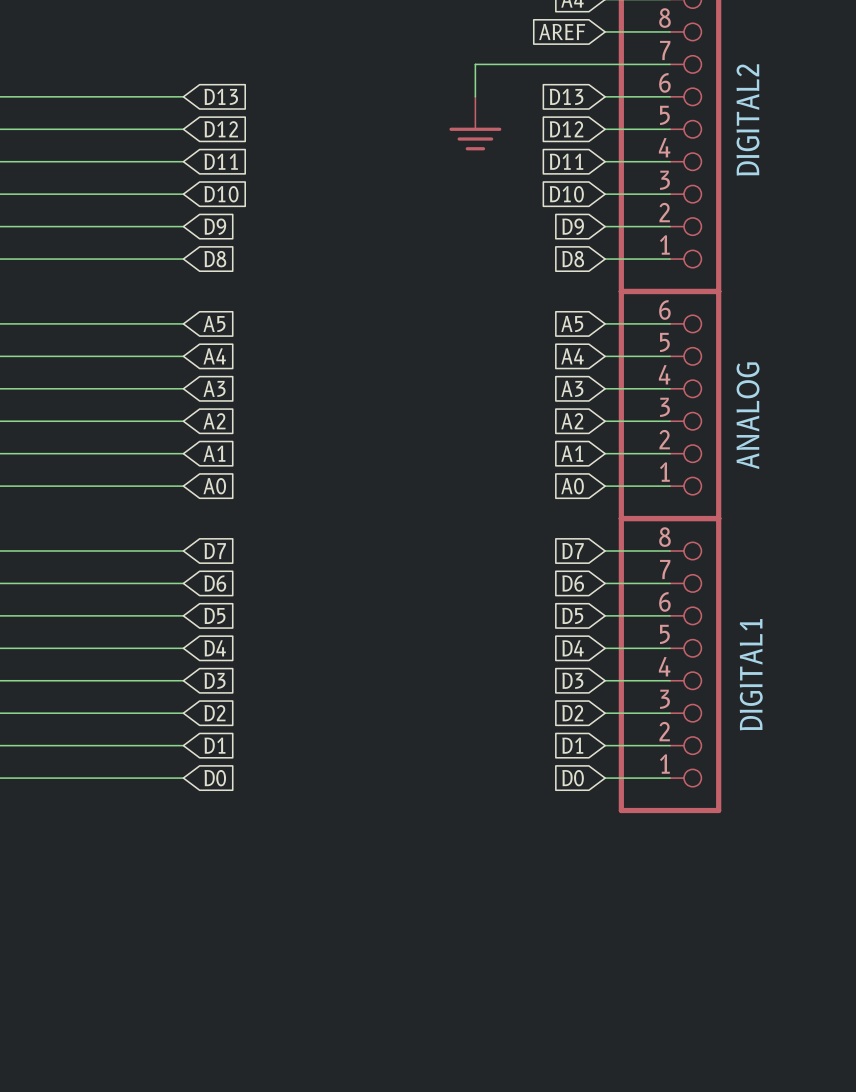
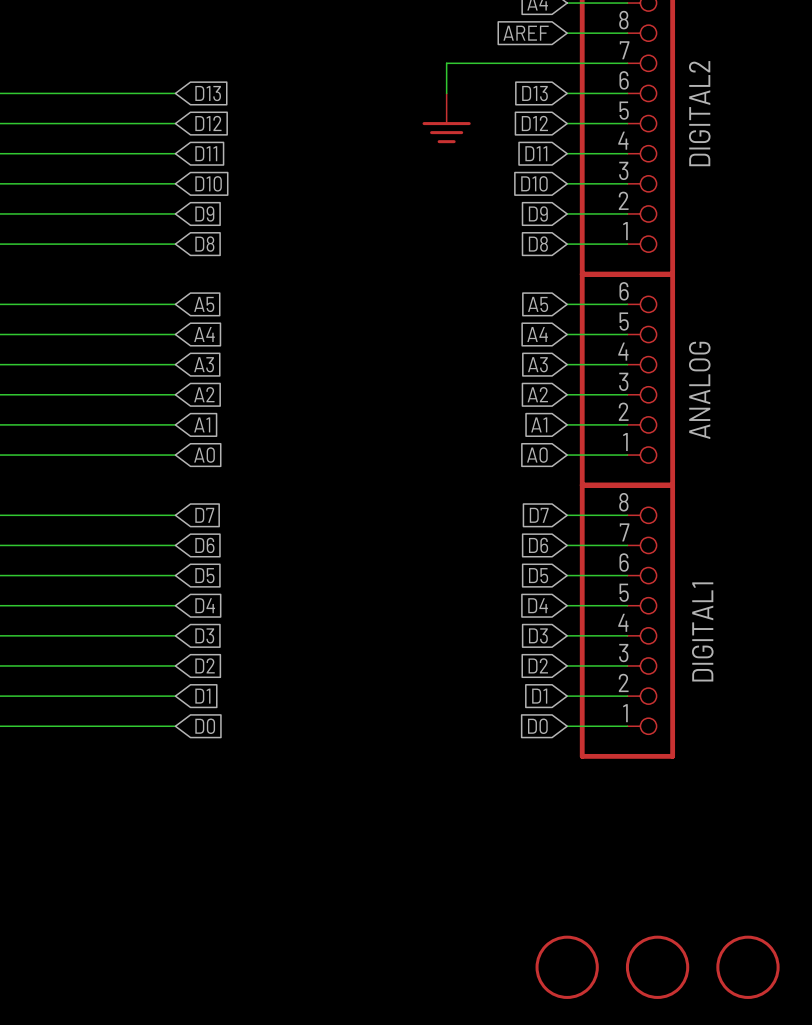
part: none -> (567, 967)
part: none -> (657, 967)
part: none -> (747, 967)

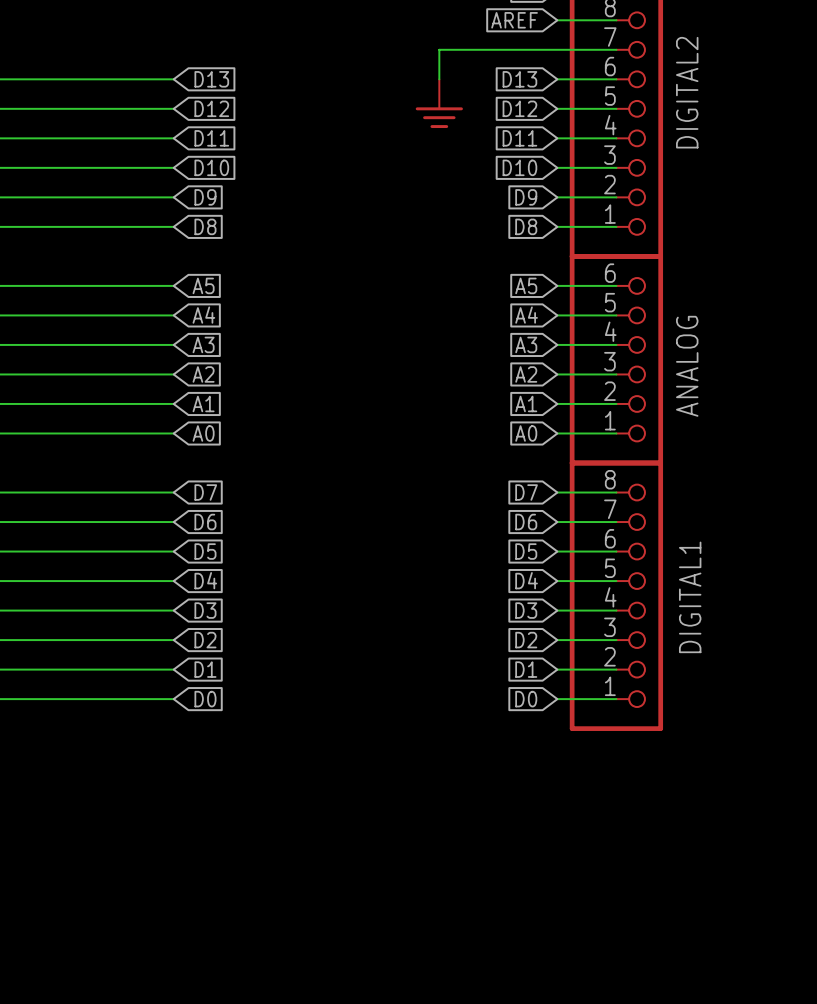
part: (567, 967) -> none
part: (657, 967) -> none
part: (747, 967) -> none

